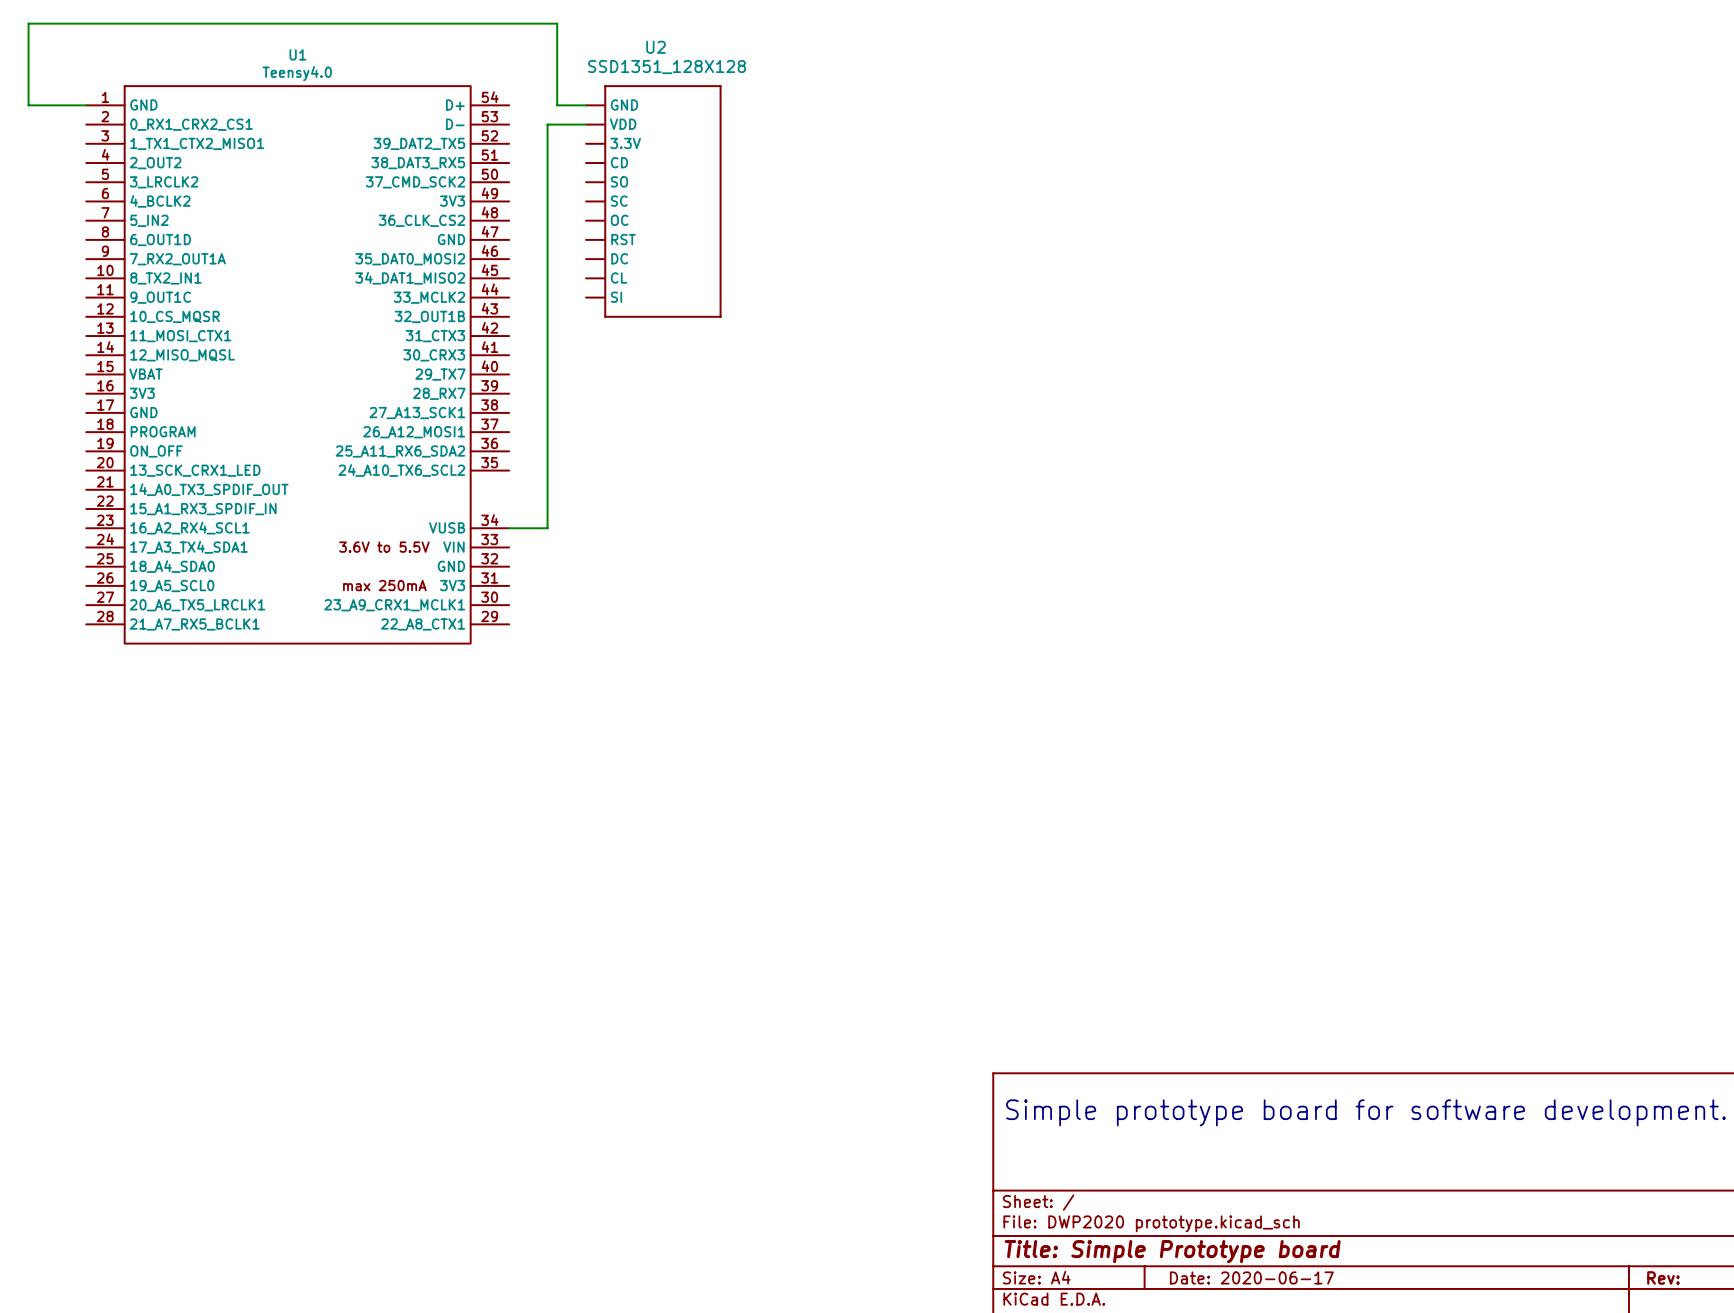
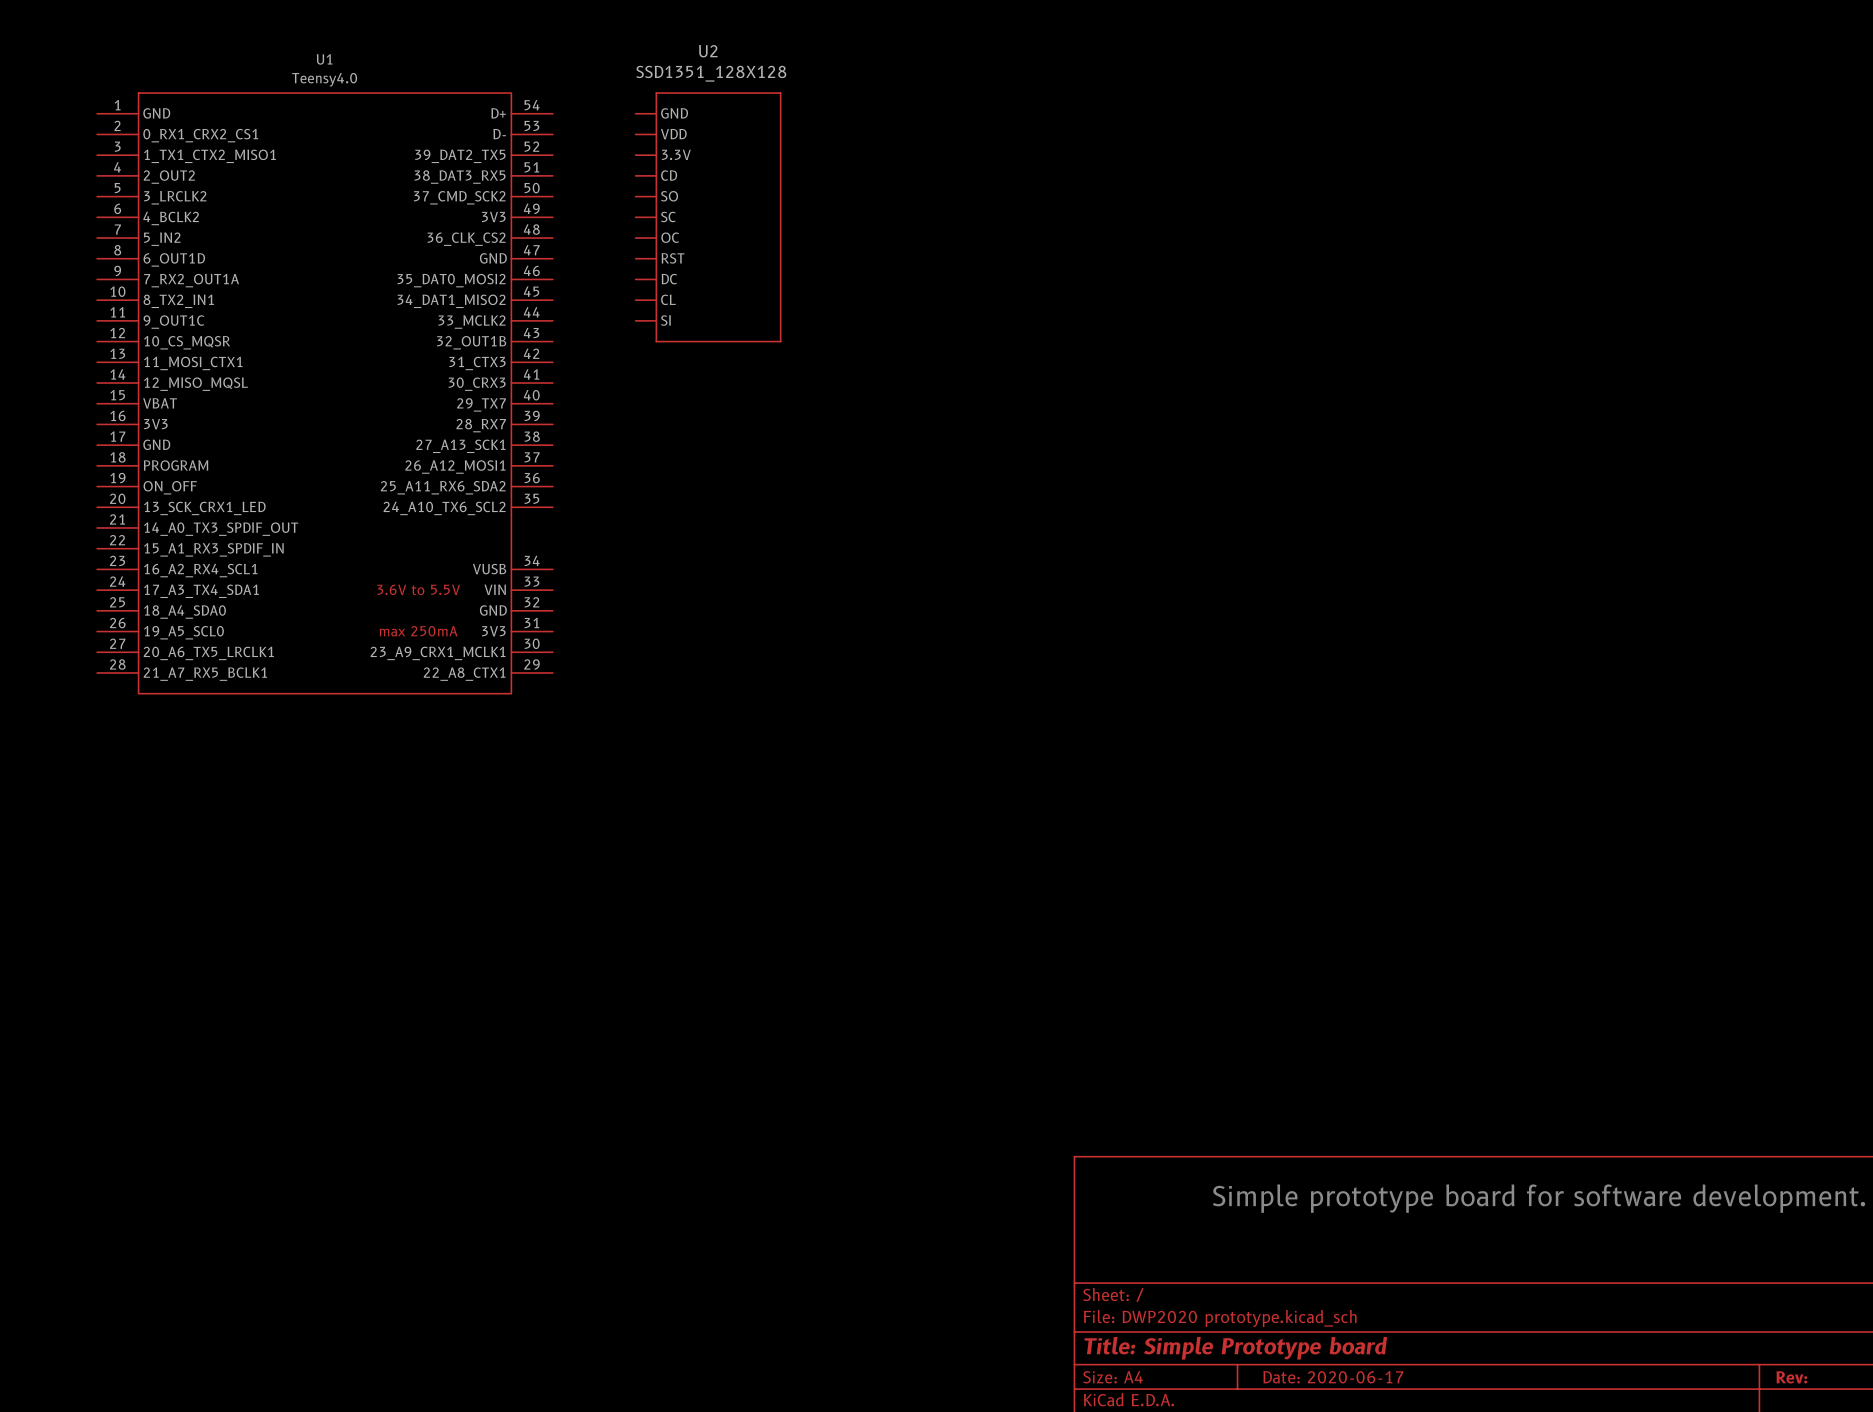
wire: (86, 105) (28, 105) (28, 23) (557, 23) (557, 105) (586, 105) -> none
wire: (586, 124) (547, 124) (547, 528) (509, 528) -> none

